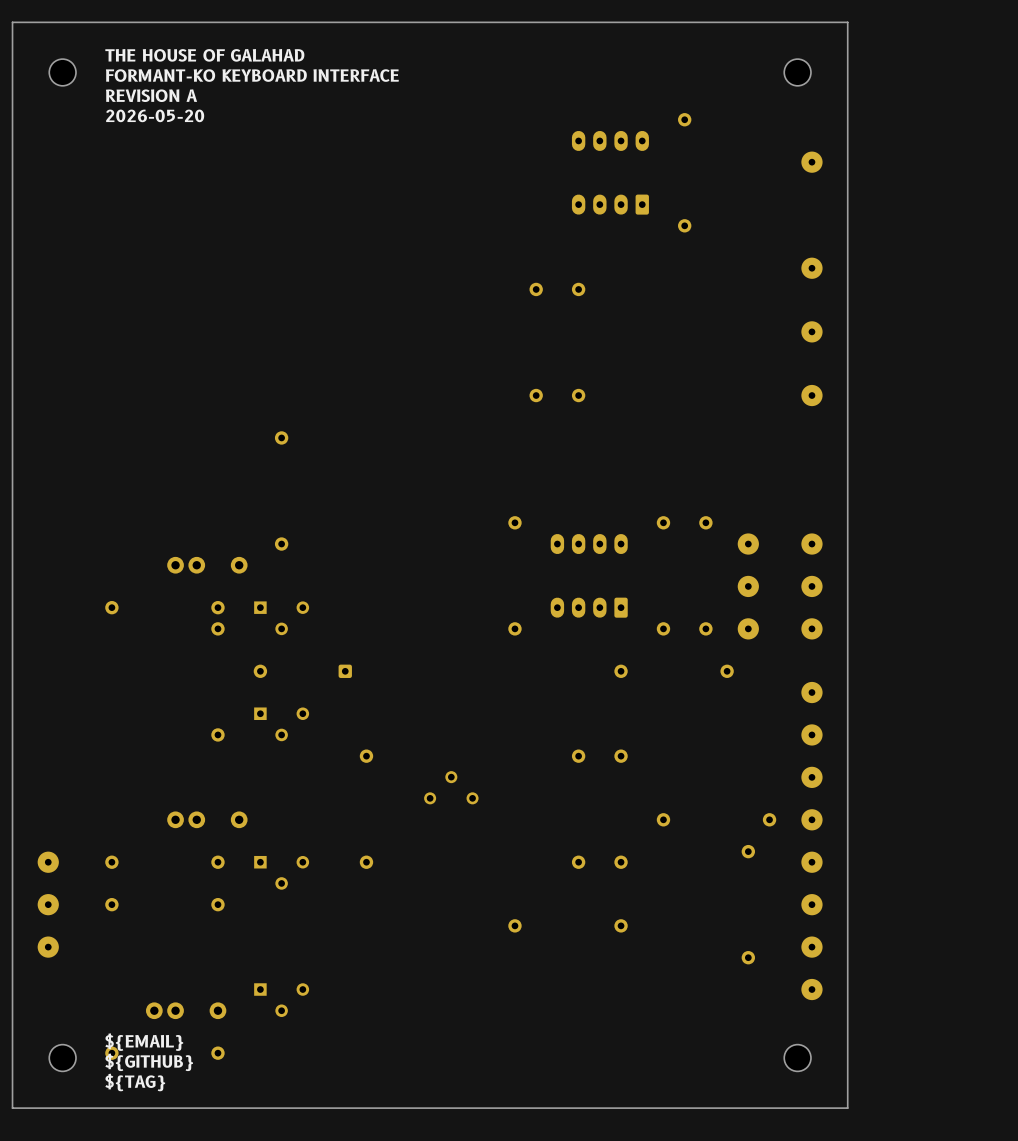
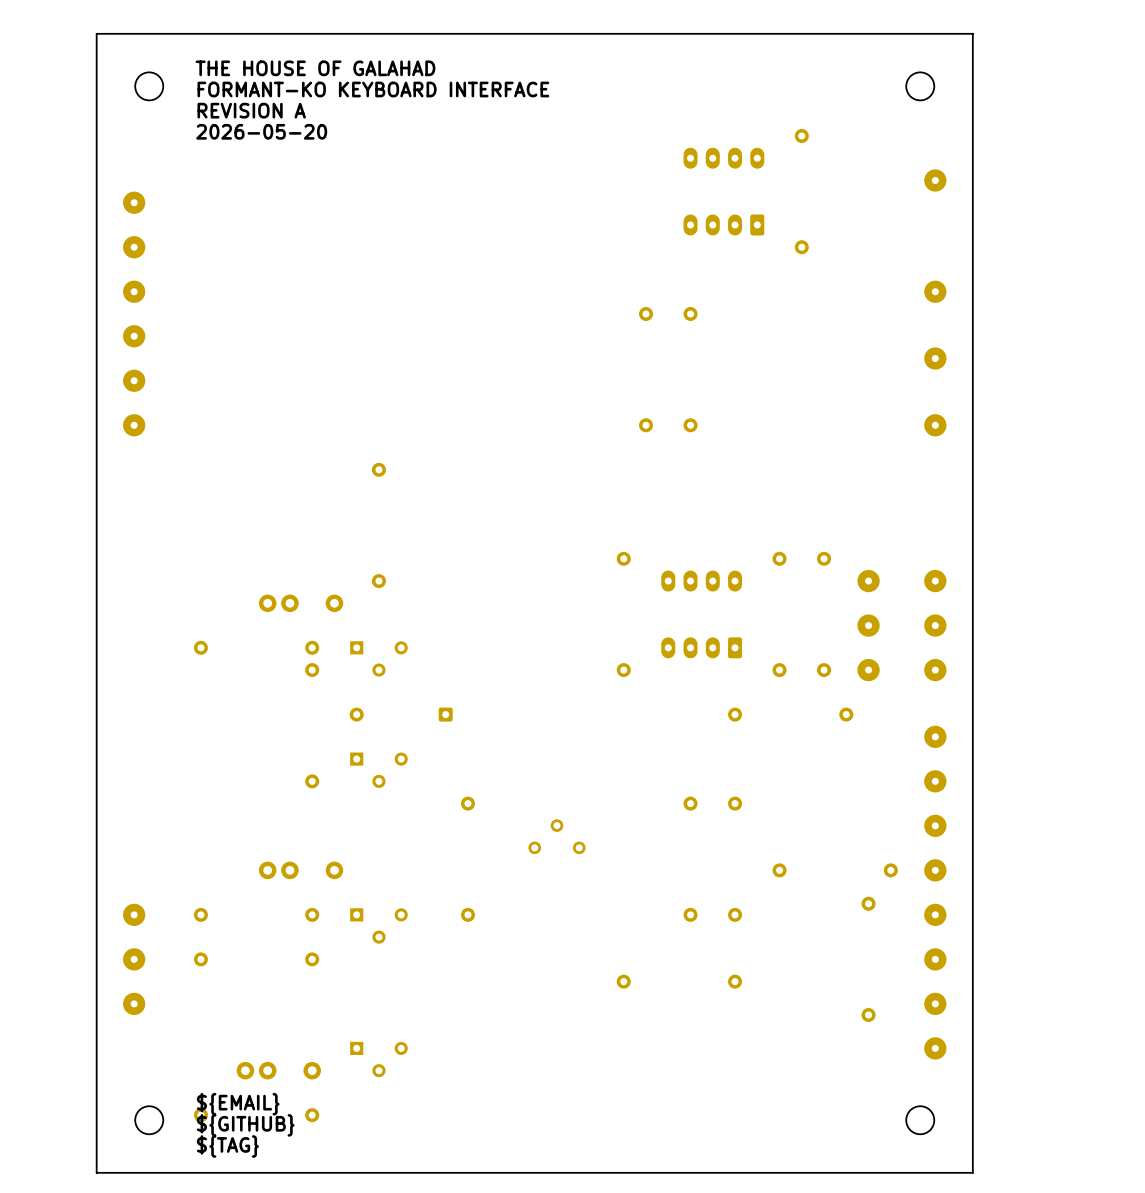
part: none -> (134, 202)
part: none -> (134, 247)
part: none -> (134, 291)
part: none -> (134, 336)
part: none -> (134, 380)
part: none -> (134, 425)

